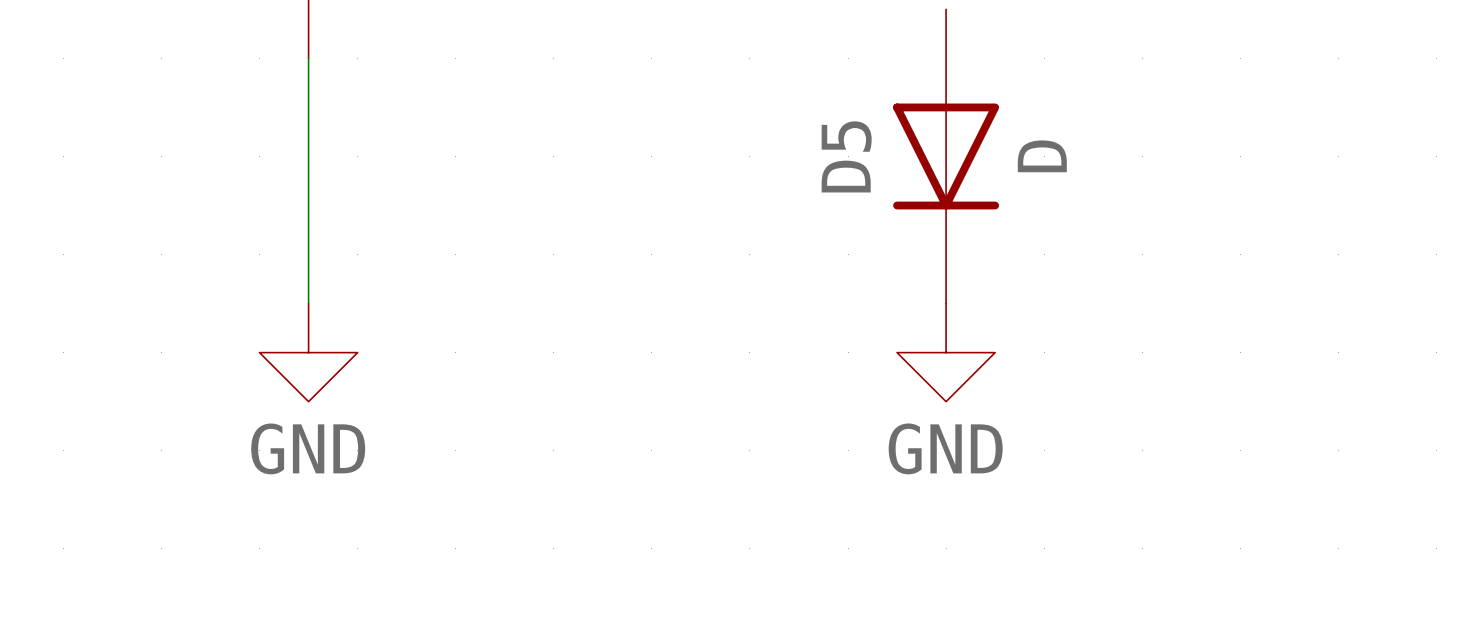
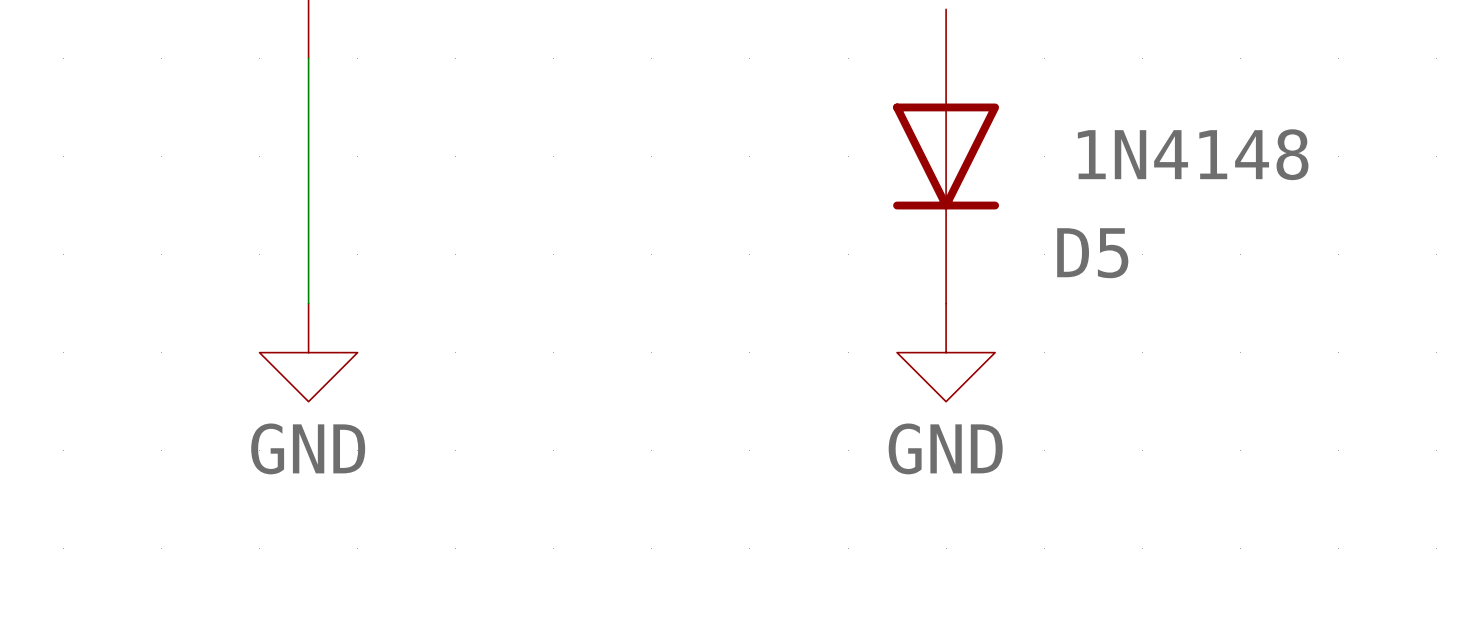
D5 name rotation: 0° (846, 156) -> 90° clockwise (1092, 253)
D5 name position: D5 (846, 156) -> D5 (1092, 253)
D5 value: D (1042, 156) -> 1N4148 (1193, 154)

